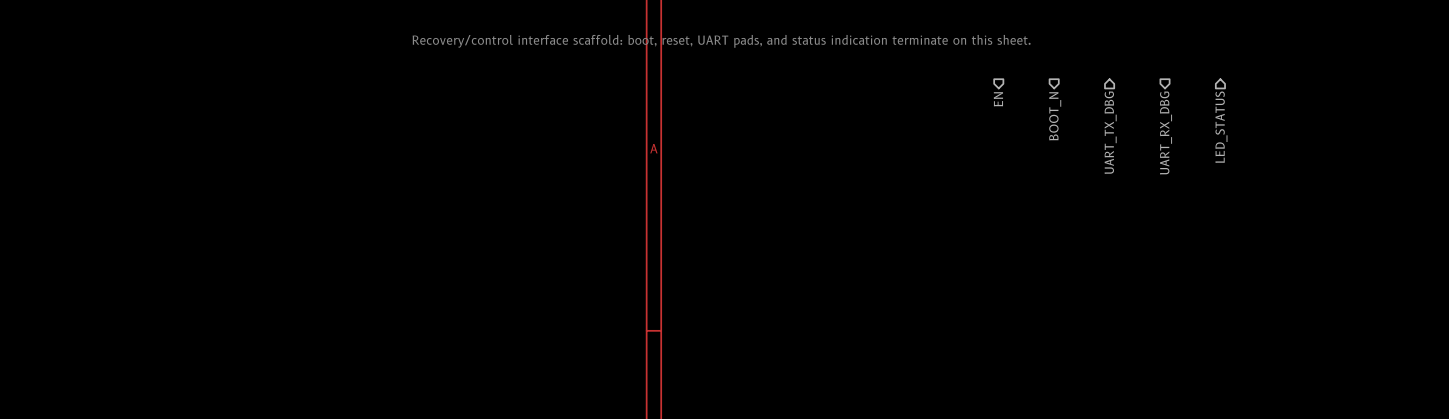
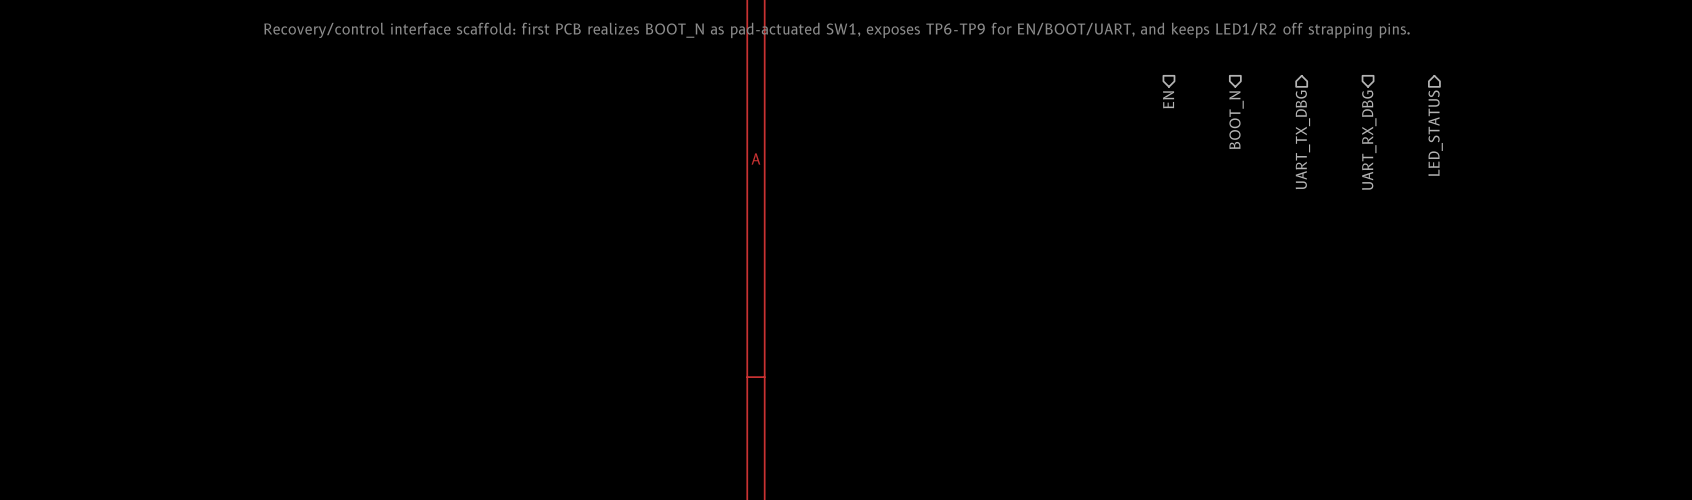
text: Recovery/control interface scaffold: boot, reset, UART pads, and status indication terminate on this sheet. (721, 41) -> Recovery/control interface scaffold: first PCB realizes BOOT_N as pad-actuated SW1, exposes TP6-TP9 for EN/BOOT/UART, and keeps LED1/R2 off strapping pins. (837, 30)

